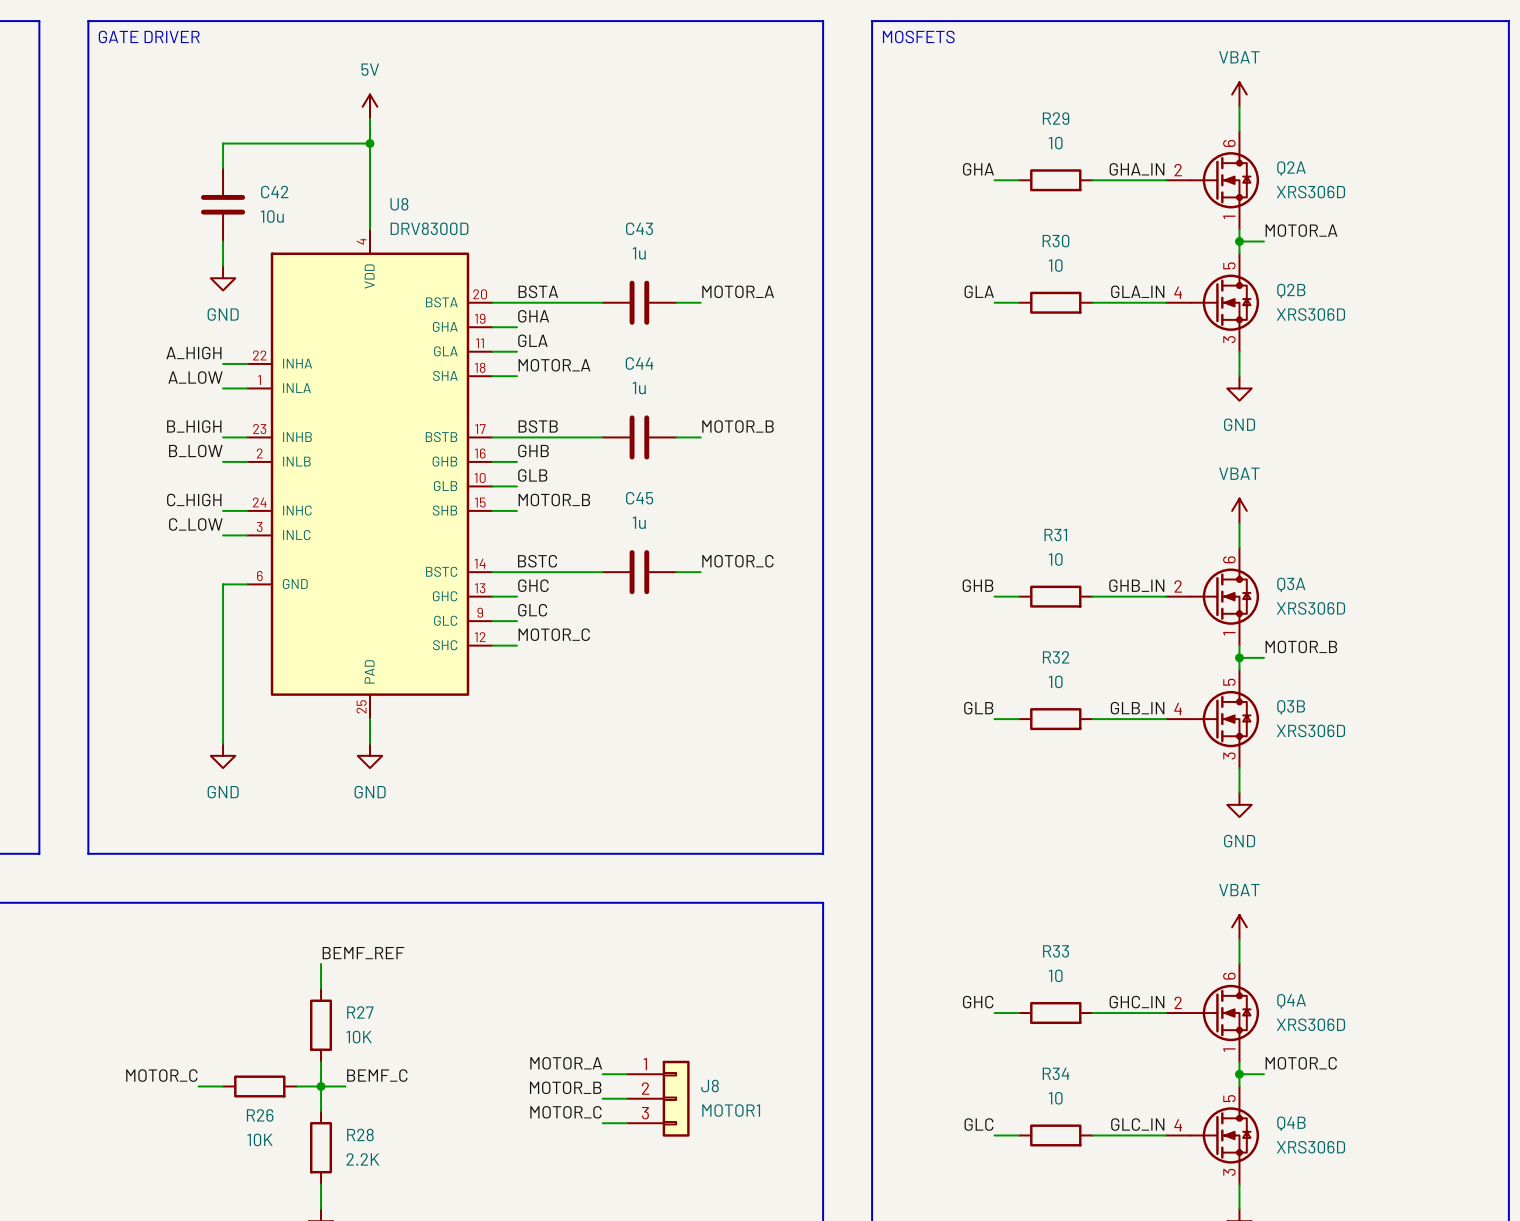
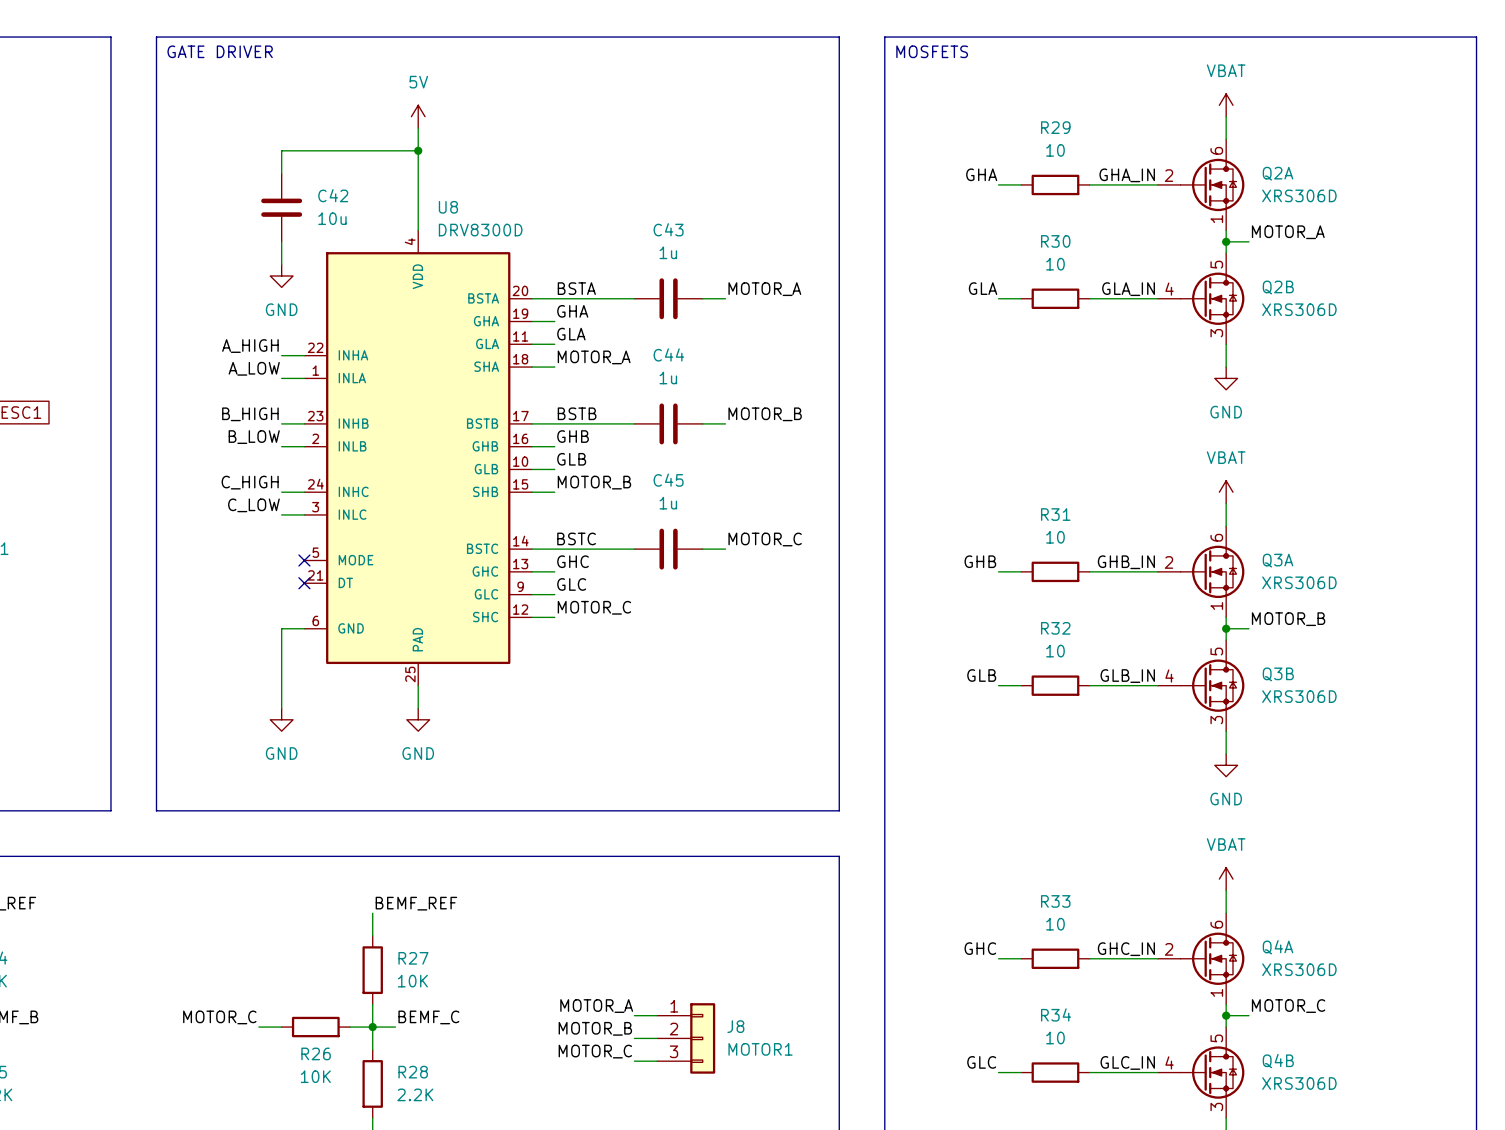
U8 symbol: [247, 229, 493, 720] -> [304, 230, 533, 686]
wire: (247, 584) (223, 584) (223, 657) -> (304, 628) (281, 628)
no-connect mark: none -> (304, 560)
no-connect mark: none -> (304, 583)

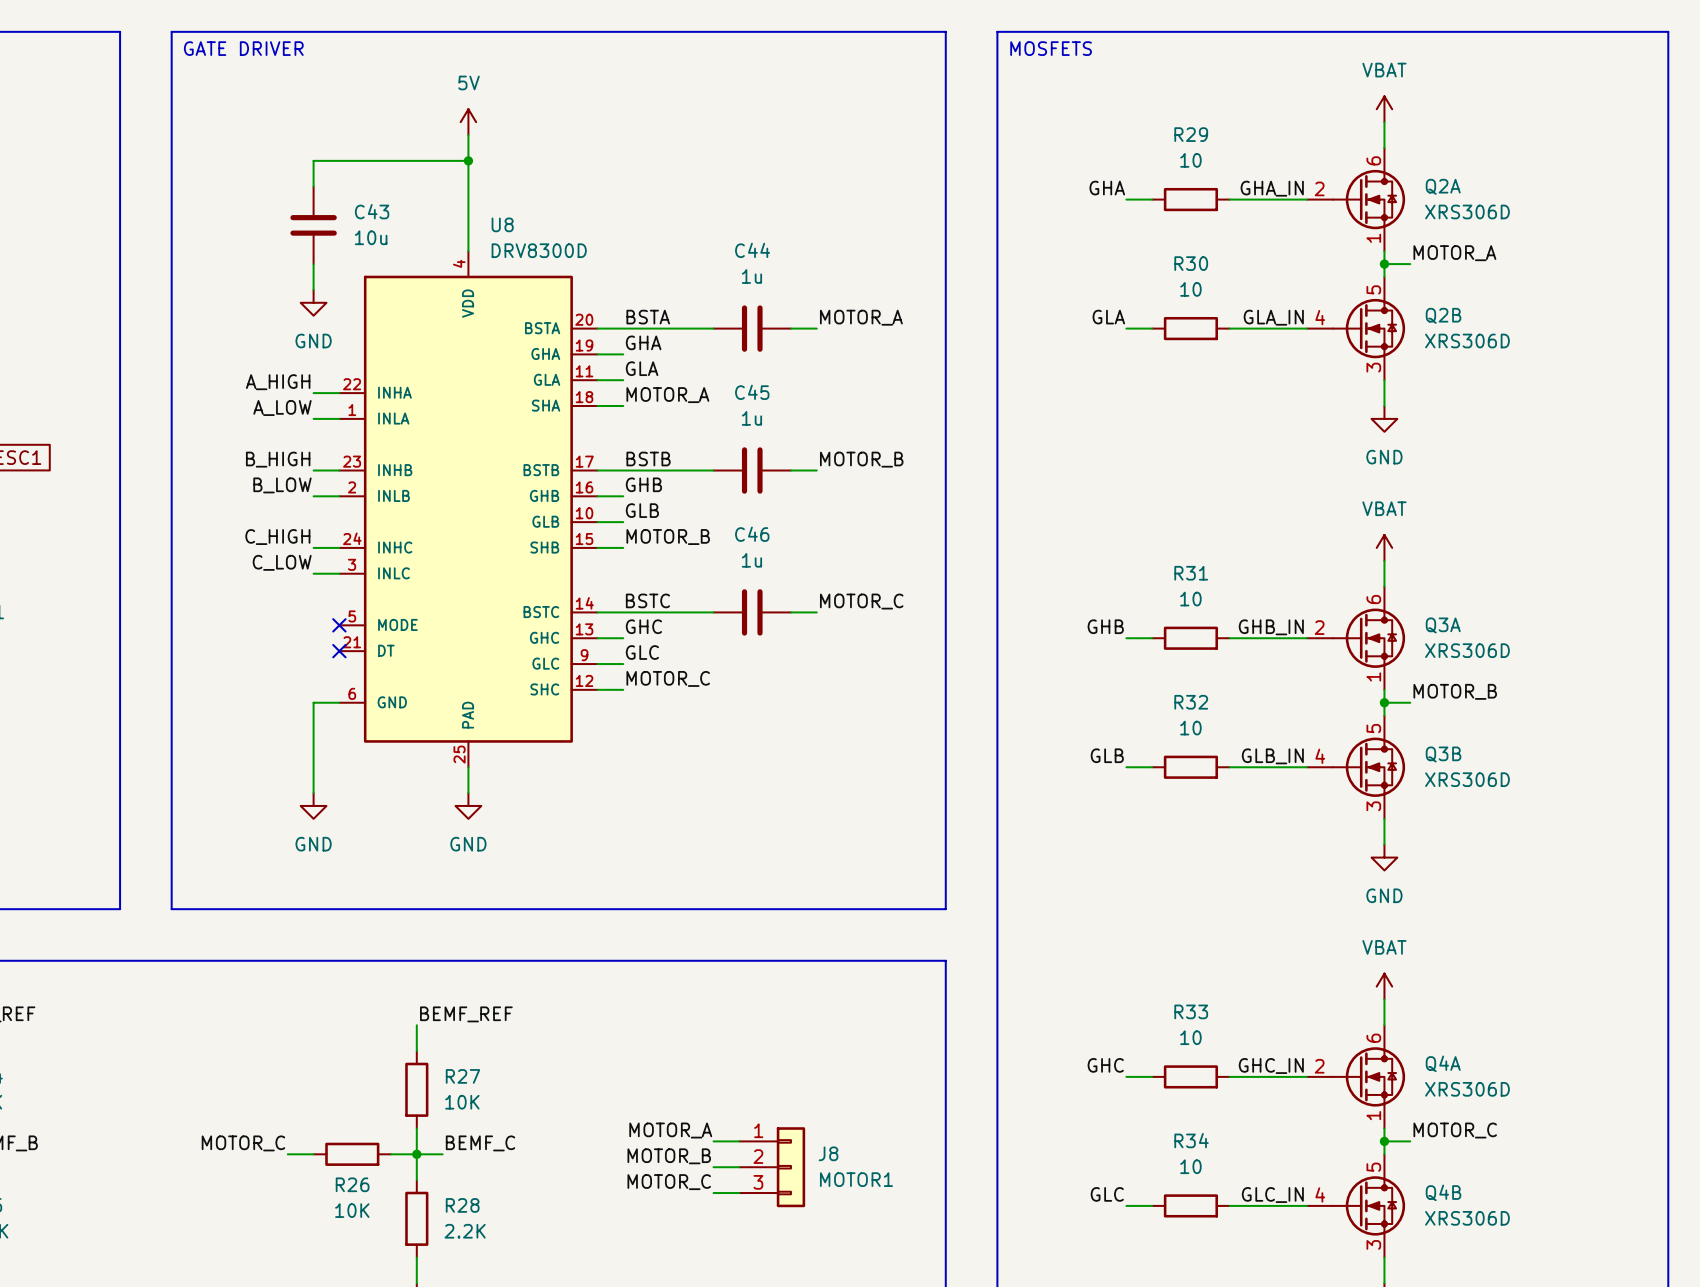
C42 name: C42 (333, 195) -> C43 (372, 211)
C43 name: C43 (668, 229) -> C44 (752, 250)
C44 name: C44 (668, 354) -> C45 (752, 392)
C45 name: C45 (668, 480) -> C46 (752, 534)

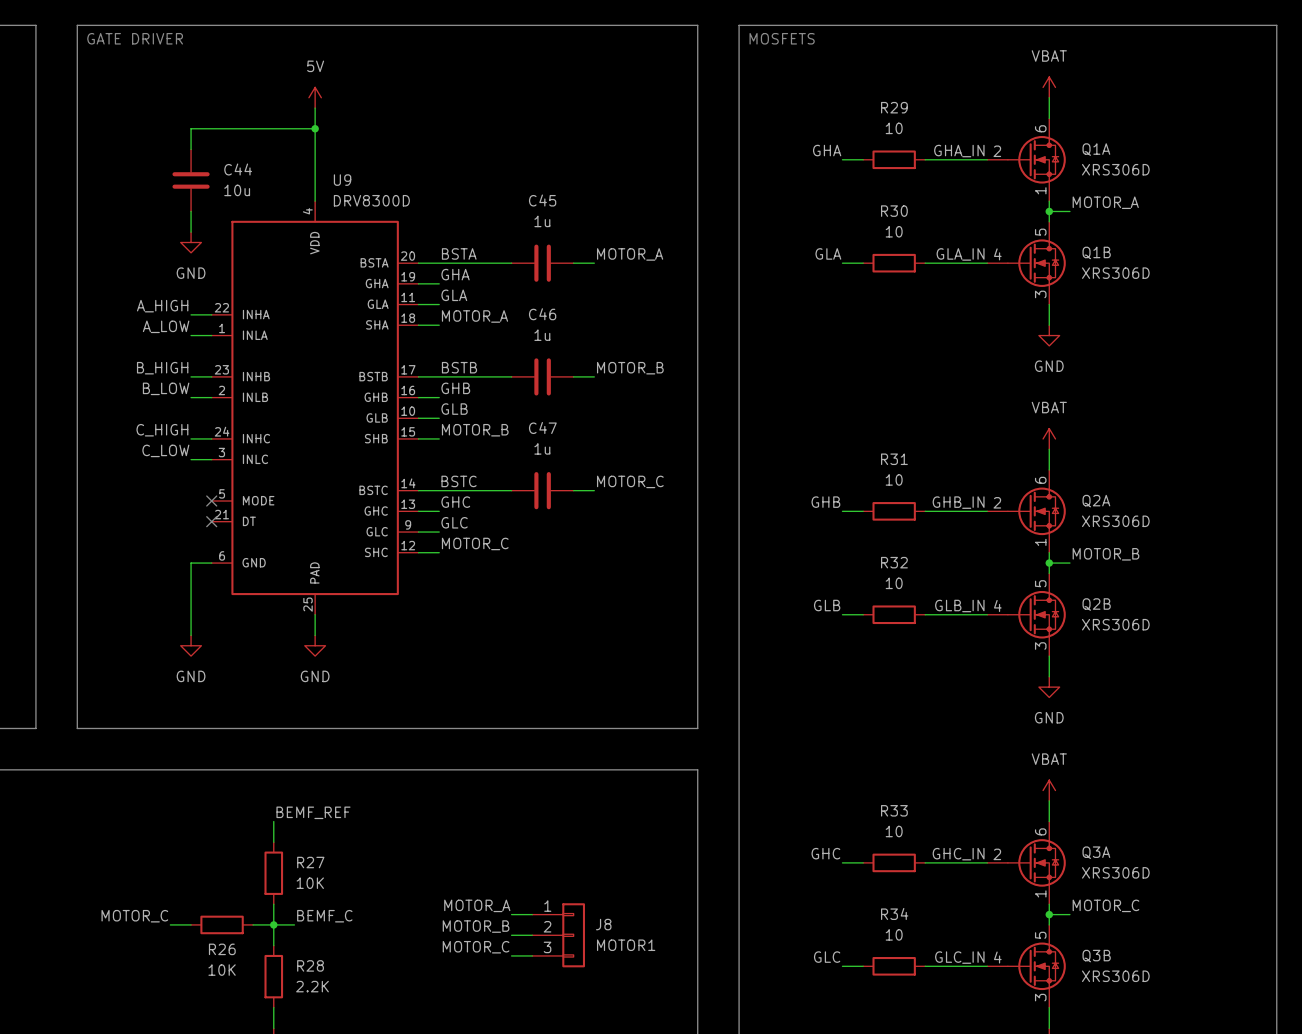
Q2A name: Q2A (1443, 186) -> Q1A (1096, 149)
C43 name: C43 (372, 211) -> C44 (238, 169)
U8 name: U8 (502, 224) -> U9 (342, 180)
C44 name: C44 (752, 250) -> C45 (542, 200)
Q2B name: Q2B (1443, 315) -> Q1B (1096, 252)
C45 name: C45 (752, 392) -> C46 (542, 314)
C46 name: C46 (752, 534) -> C47 (542, 427)
Q3A name: Q3A (1443, 625) -> Q2A (1096, 501)
Q3B name: Q3B (1443, 754) -> Q2B (1096, 604)
Q4A name: Q4A (1443, 1063) -> Q3A (1096, 852)
Q4B name: Q4B (1443, 1192) -> Q3B (1096, 956)

